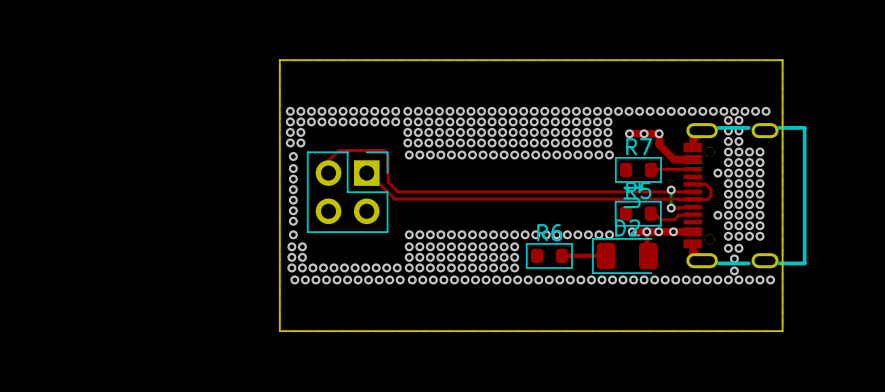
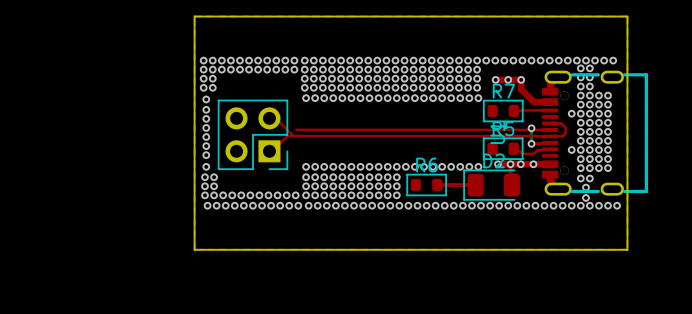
top track: (328, 173) (328, 160) (338, 150) (383, 150) (388, 155) (388, 182) (397, 191) -> none
part rotation: 0° (347, 192) -> 90° clockwise (253, 134)
top track: none -> (293, 136) (287, 136) (274, 148)

